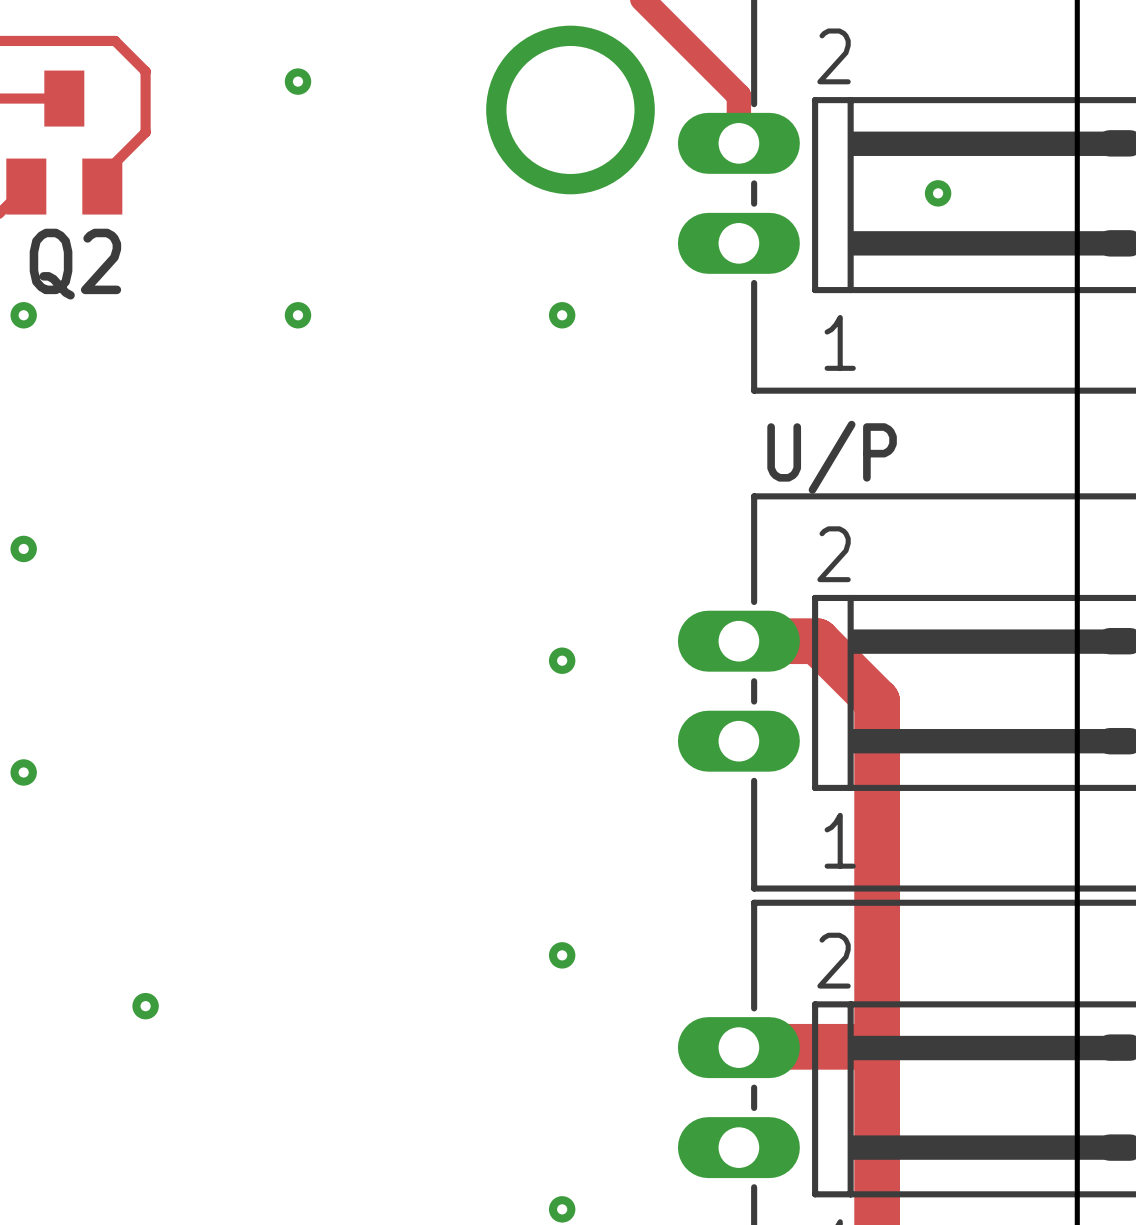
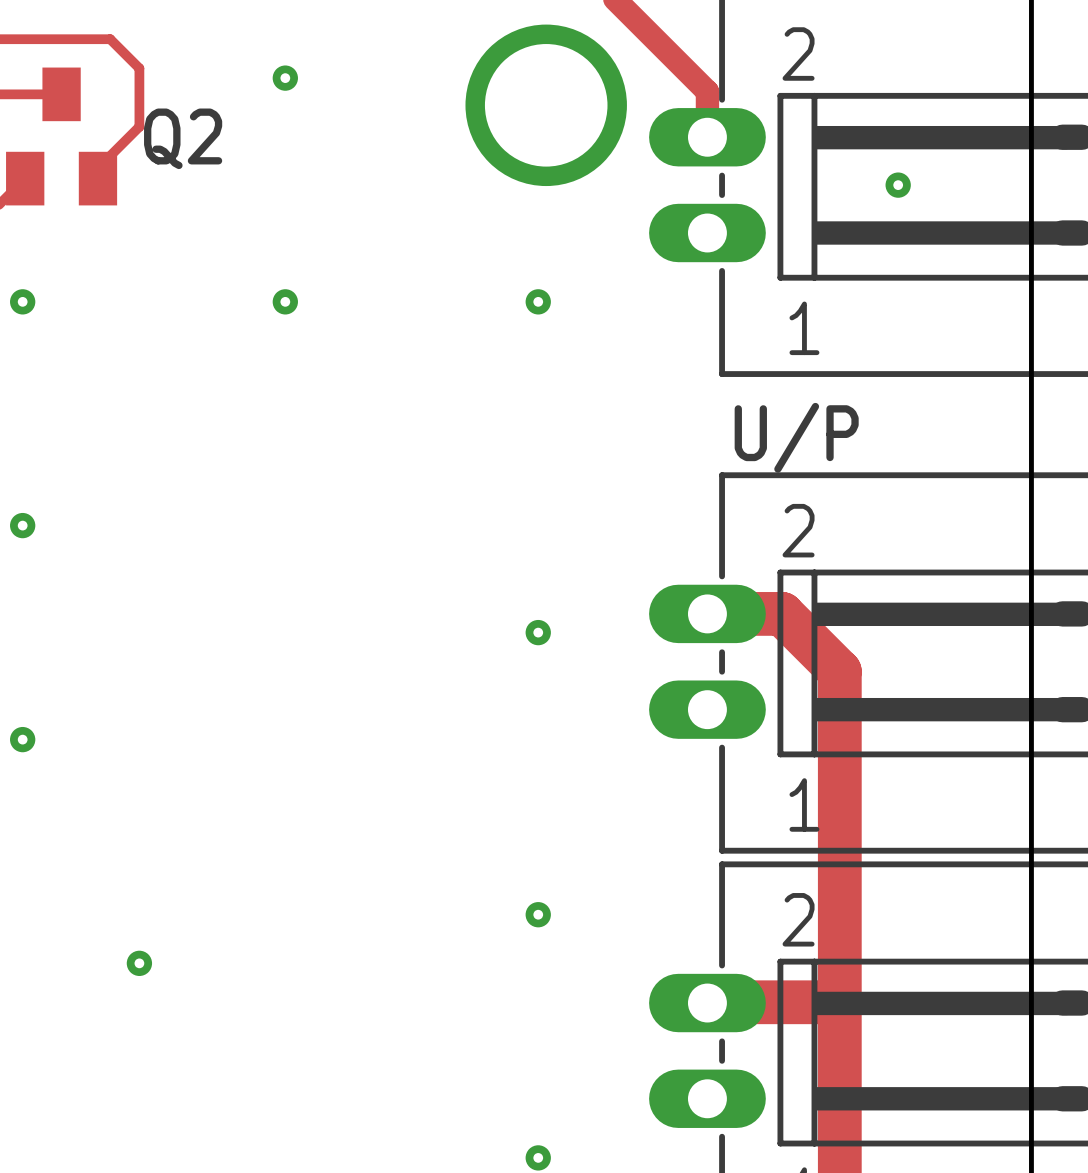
Q2 name position: Q2 (75, 264) -> Q2 (183, 138)

